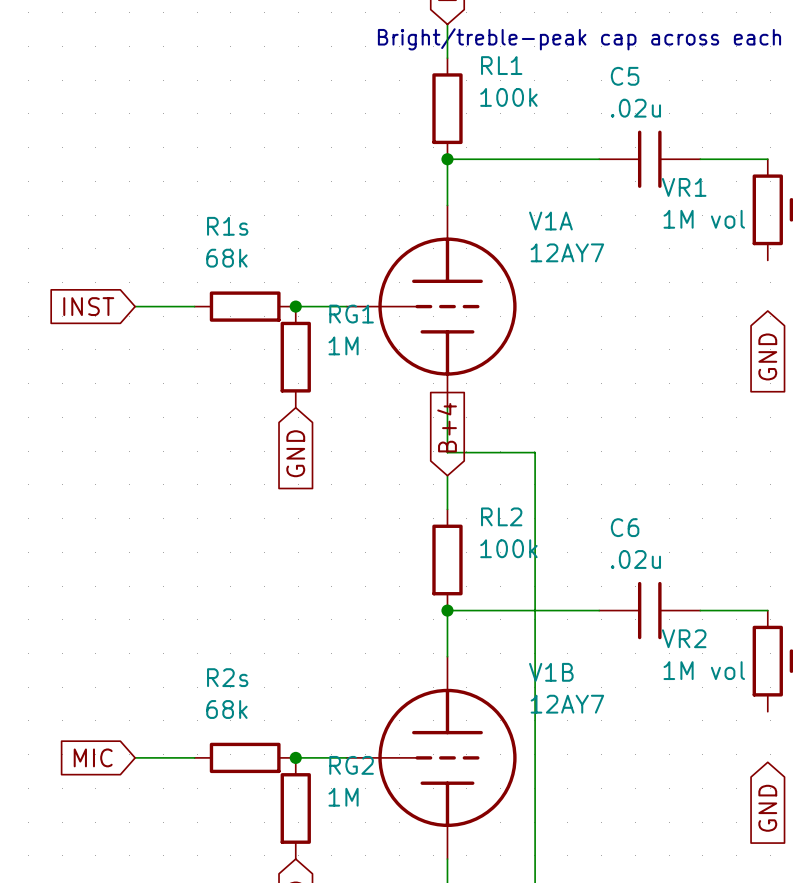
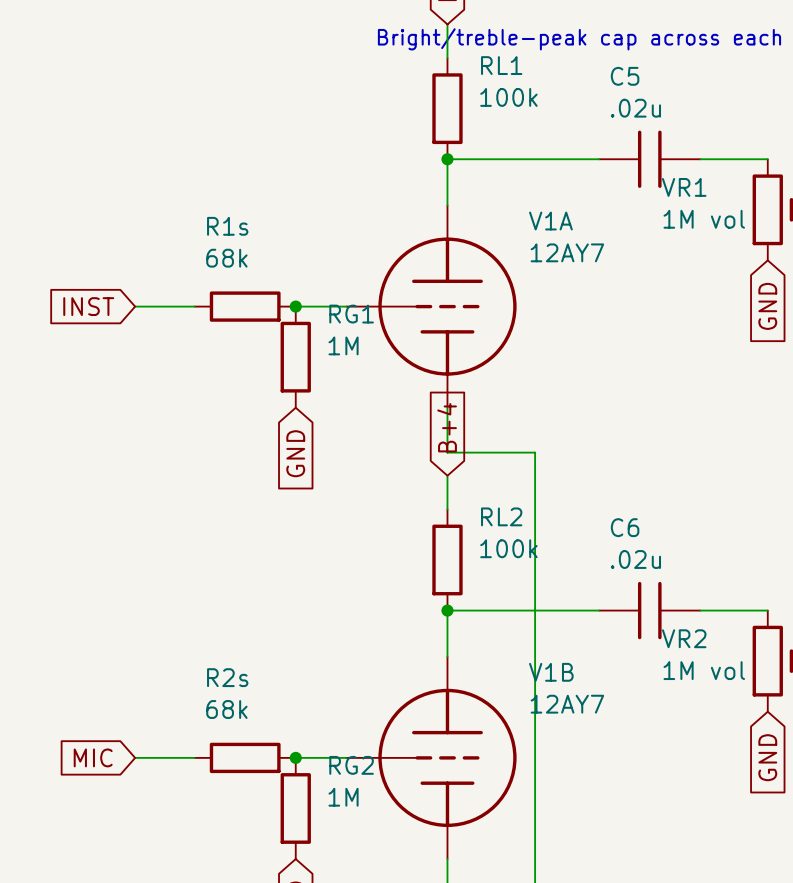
global label position: GND (767, 356) -> GND (767, 306)
global label position: GND (767, 808) -> GND (767, 757)

